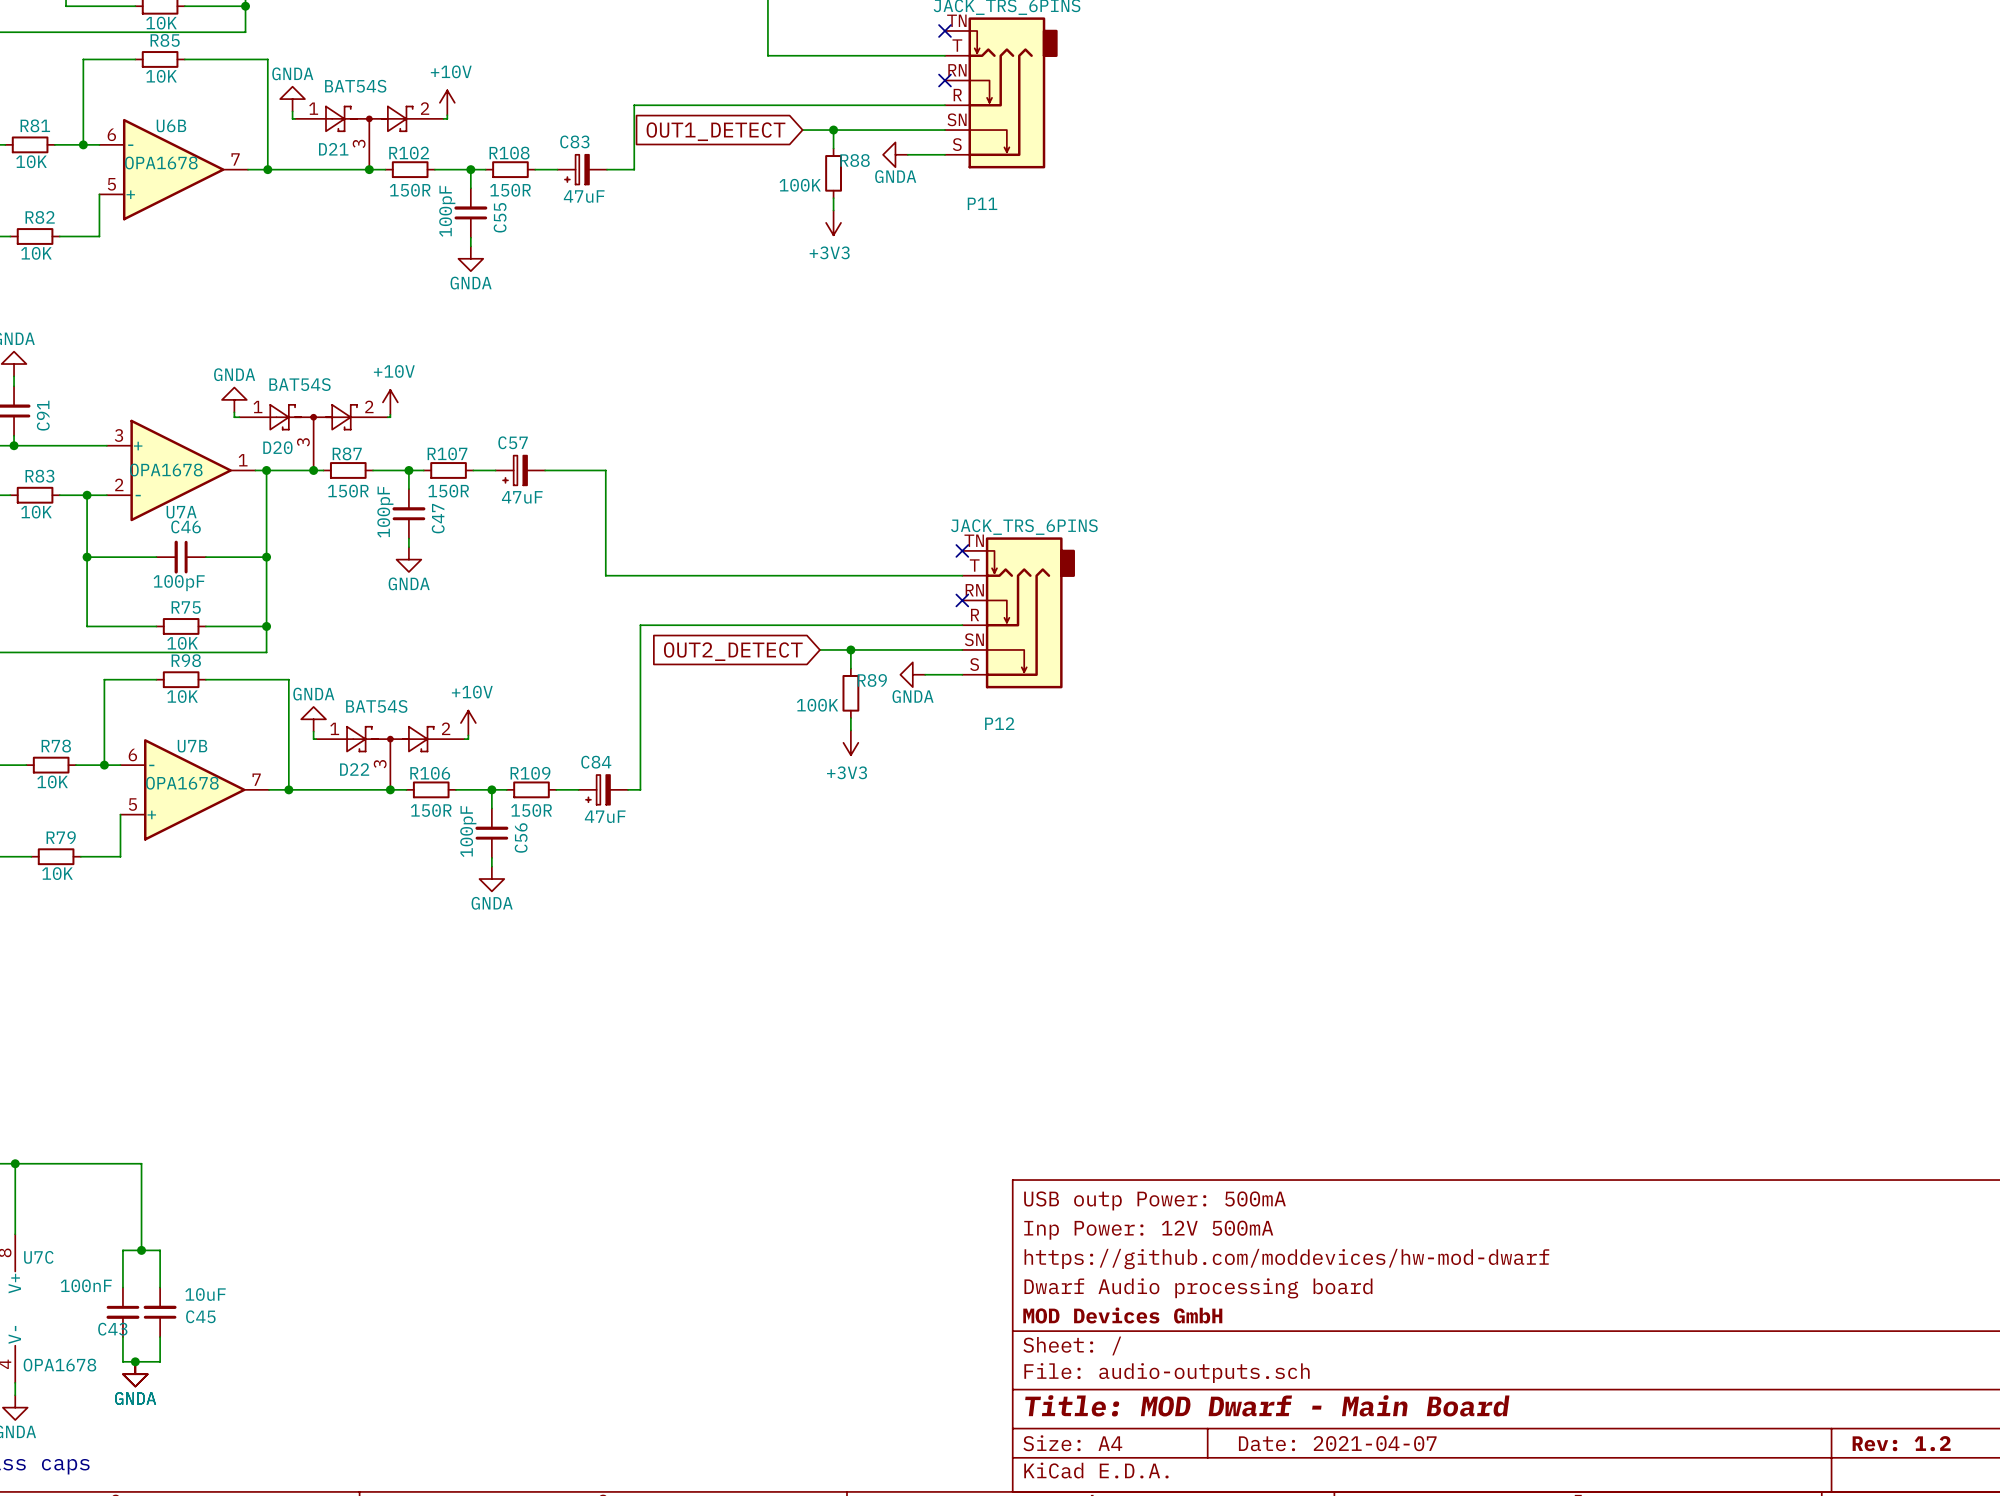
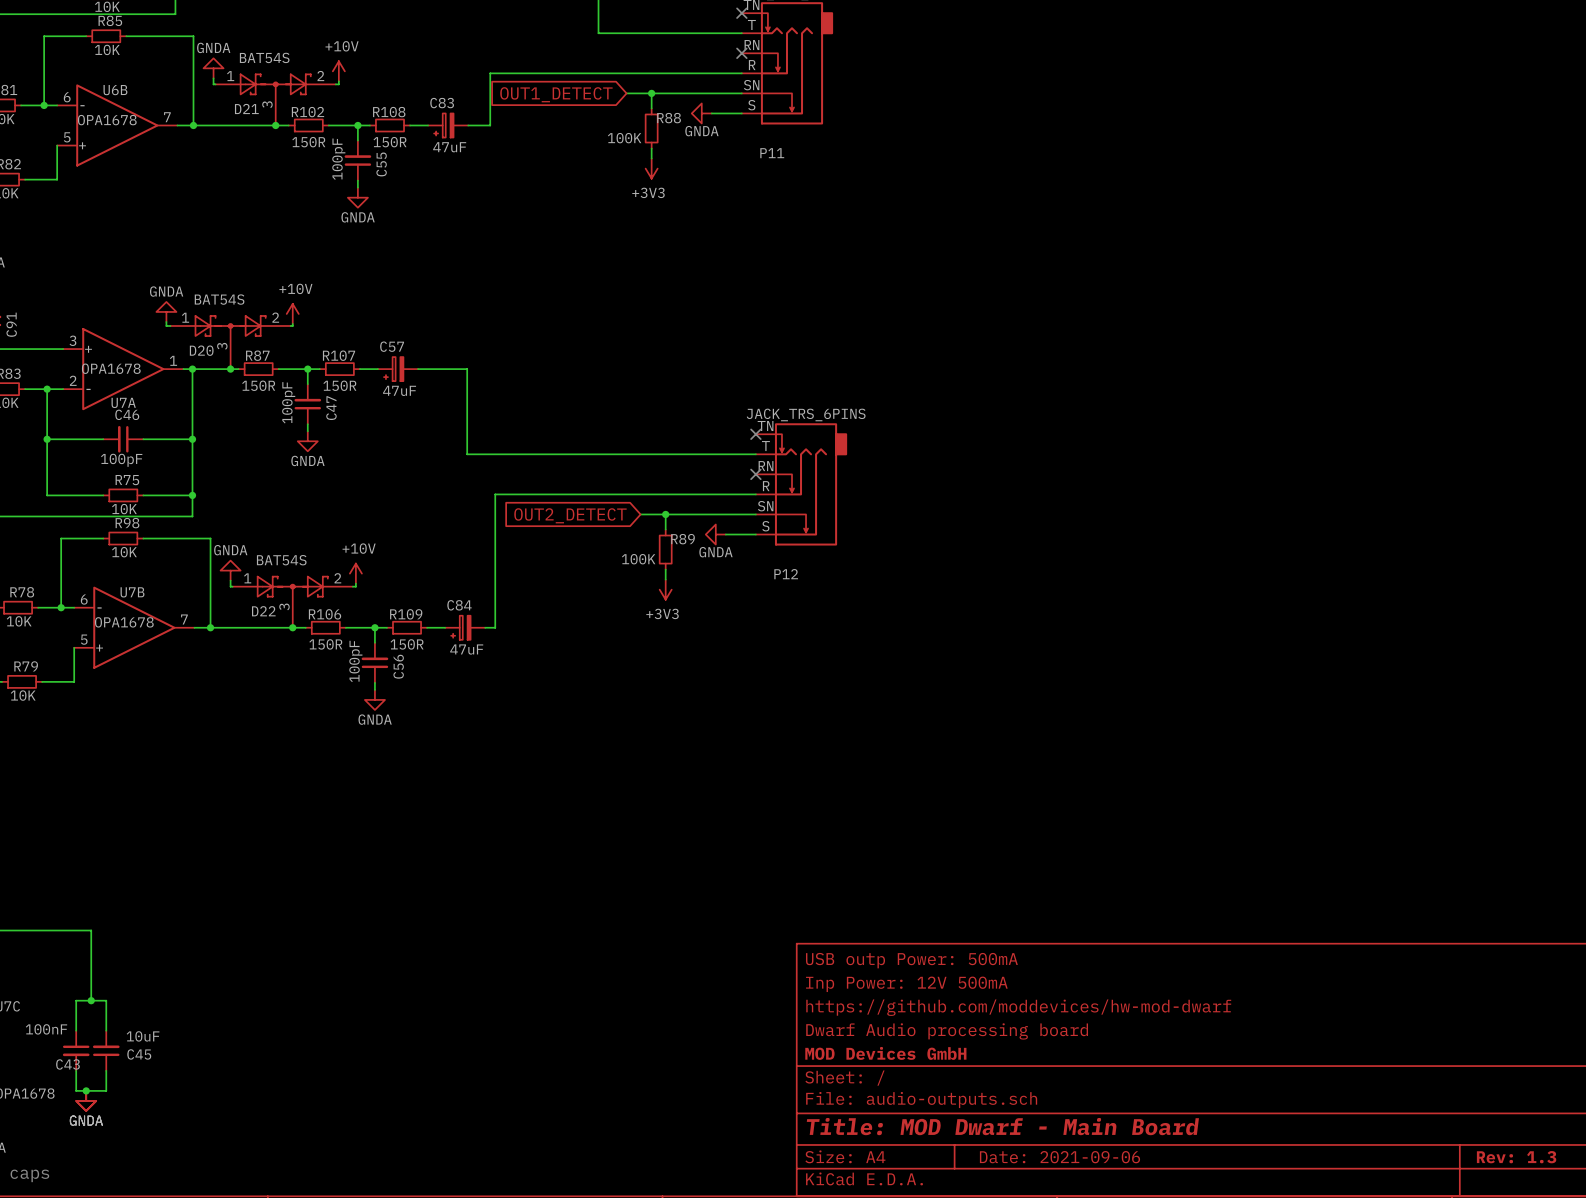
title block: Date: 2021-04-07 (1337, 1443) -> Date: 2021-09-06 (1059, 1157)
title block: Rev: 1.2 (1901, 1443) -> Rev: 1.3 (1516, 1157)

